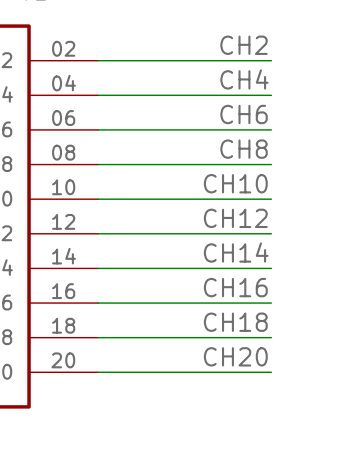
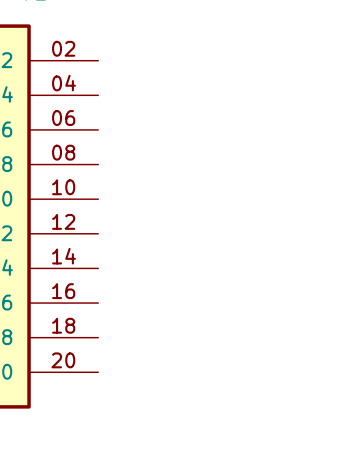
label: CH2 (244, 45) -> none
wire: (98, 60) (271, 60) -> none
label: CH4 (244, 79) -> none
wire: (98, 95) (271, 95) -> none
label: CH6 (244, 114) -> none
wire: (98, 129) (271, 129) -> none
label: CH8 (244, 149) -> none
wire: (98, 164) (271, 164) -> none
label: CH10 (235, 183) -> none
wire: (98, 199) (271, 199) -> none
label: CH12 (235, 218) -> none
wire: (98, 233) (271, 233) -> none
label: CH14 (236, 252) -> none
wire: (98, 268) (271, 268) -> none
label: CH16 (235, 287) -> none
wire: (98, 303) (271, 303) -> none
label: CH18 (235, 322) -> none
wire: (98, 337) (271, 337) -> none
label: CH20 (235, 356) -> none
wire: (98, 372) (271, 372) -> none

